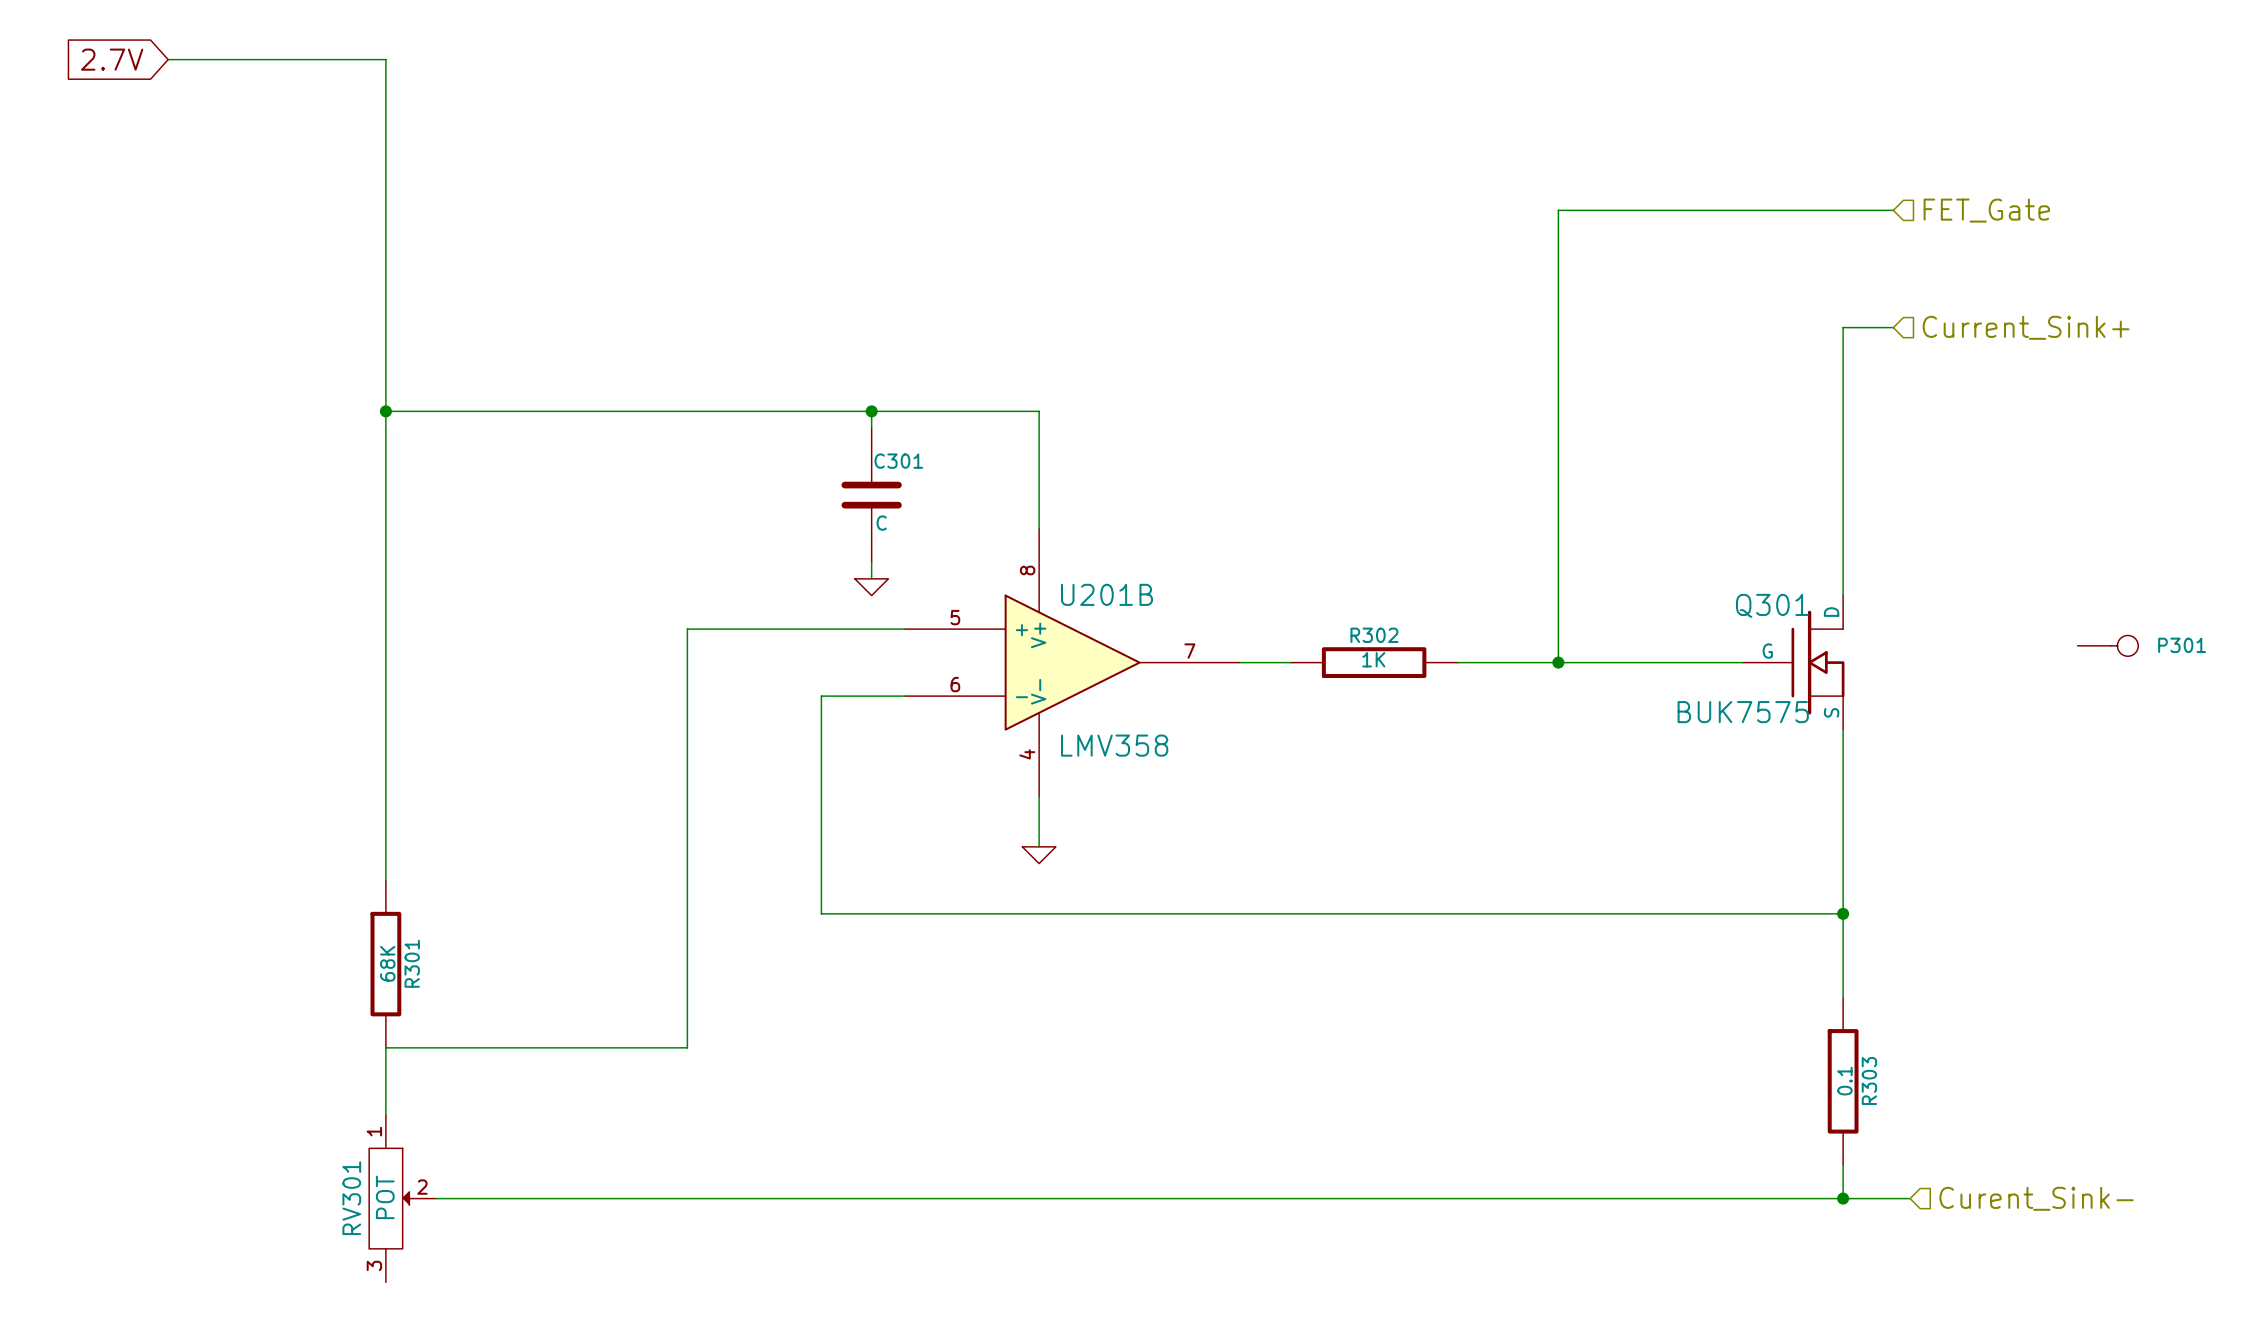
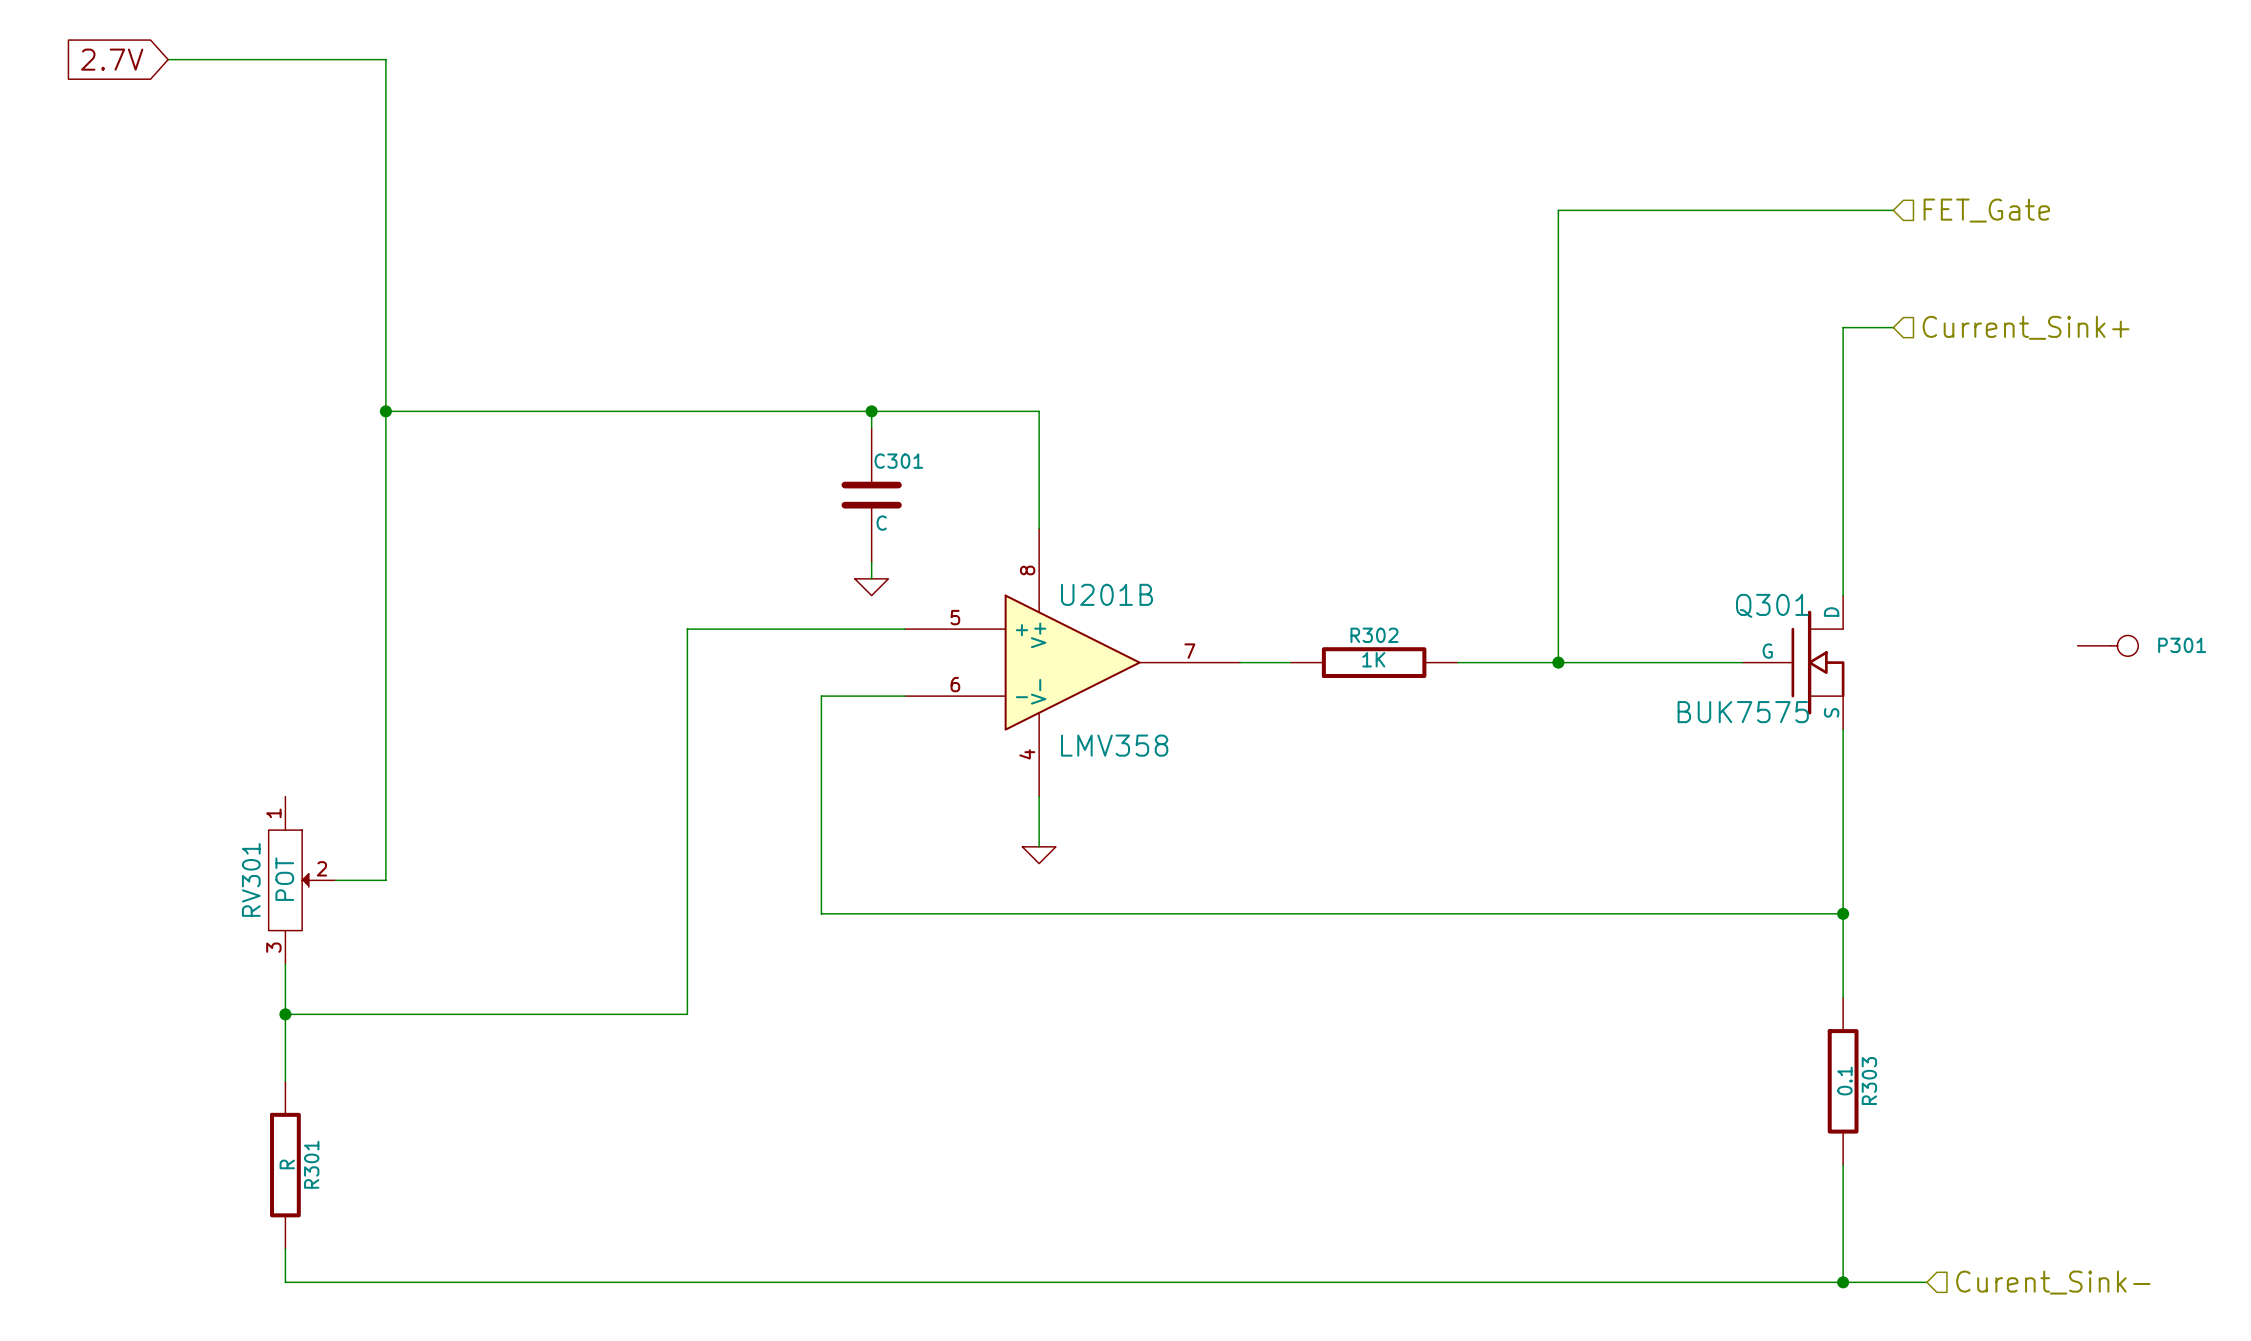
wire: none -> (335, 880) (385, 880)
R301 value: 68K (387, 963) -> R (287, 1164)
wire: none -> (285, 964) (285, 1081)
R301 position: (385, 964) -> (285, 1165)
junction: none -> (285, 1014)
wire: (687, 1014) (687, 1047) (385, 1047) (385, 1114) -> (687, 1014) (285, 1014)
RV301 position: (402, 1198) -> (302, 880)
wire: (436, 1198) (1910, 1198) -> none
wire: none -> (1843, 1198) (1843, 1282)
junction: (1843, 1198) -> none
hierarchical label position: Curent_Sink- (2036, 1198) -> Curent_Sink- (2053, 1282)
wire: none -> (285, 1248) (285, 1282) (1926, 1282)
junction: none -> (1843, 1282)

